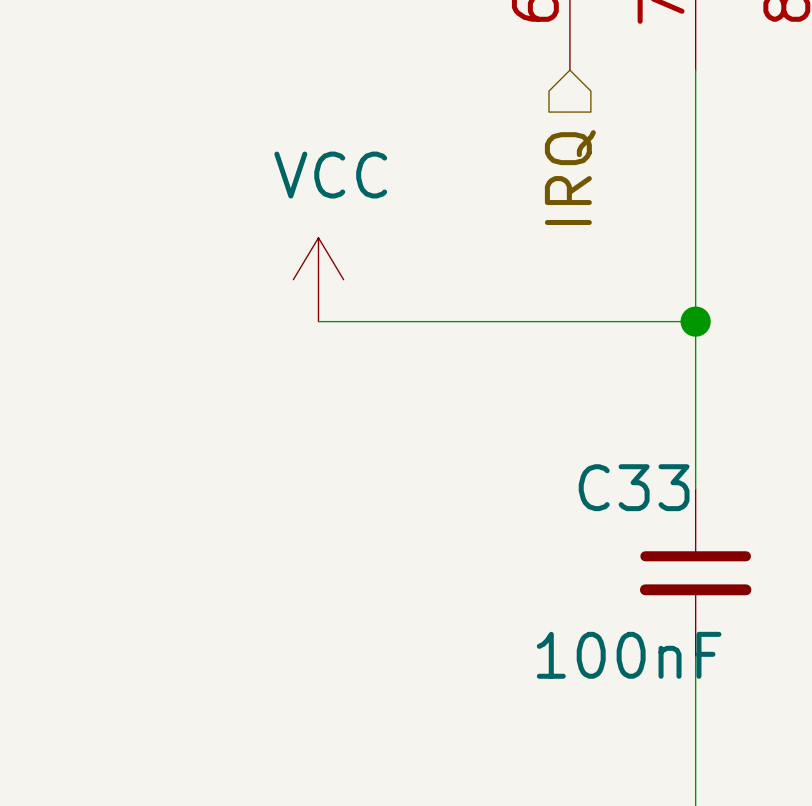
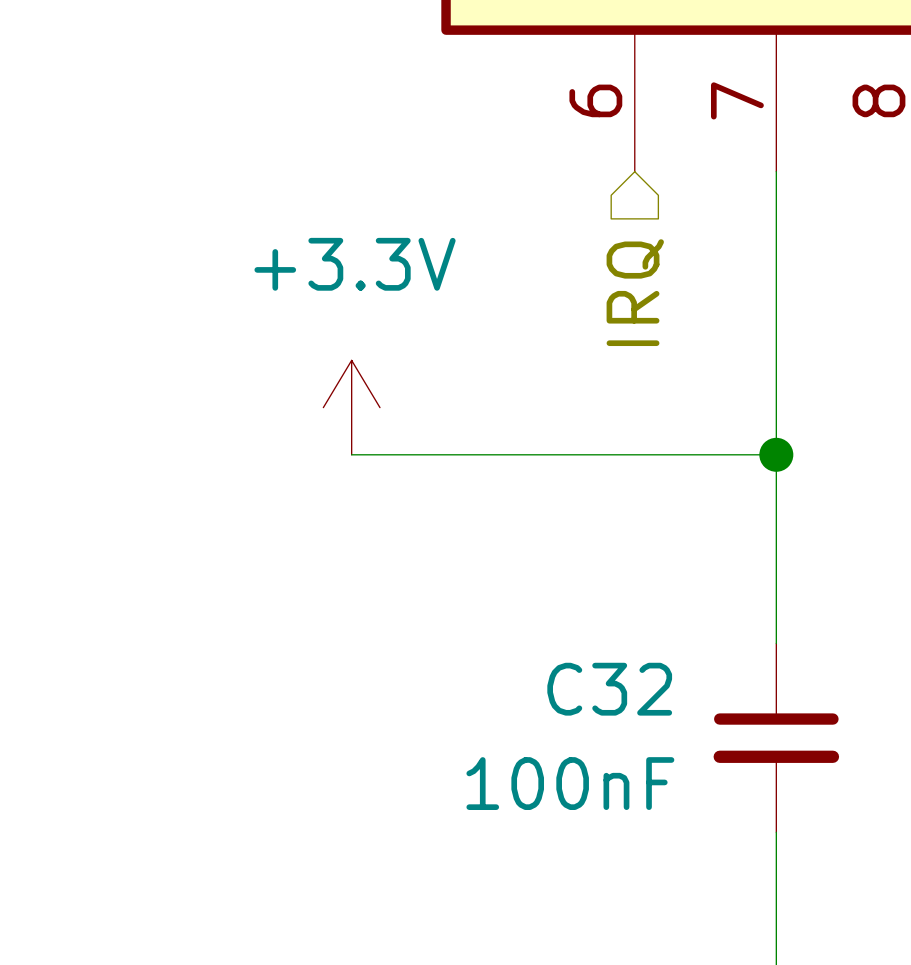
power symbol: VCC (318, 279) -> +3.3V (351, 407)
C33 name: C33 (634, 487) -> C32 (609, 689)
C33 value position: 100nF (629, 655) -> 100nF (570, 783)

